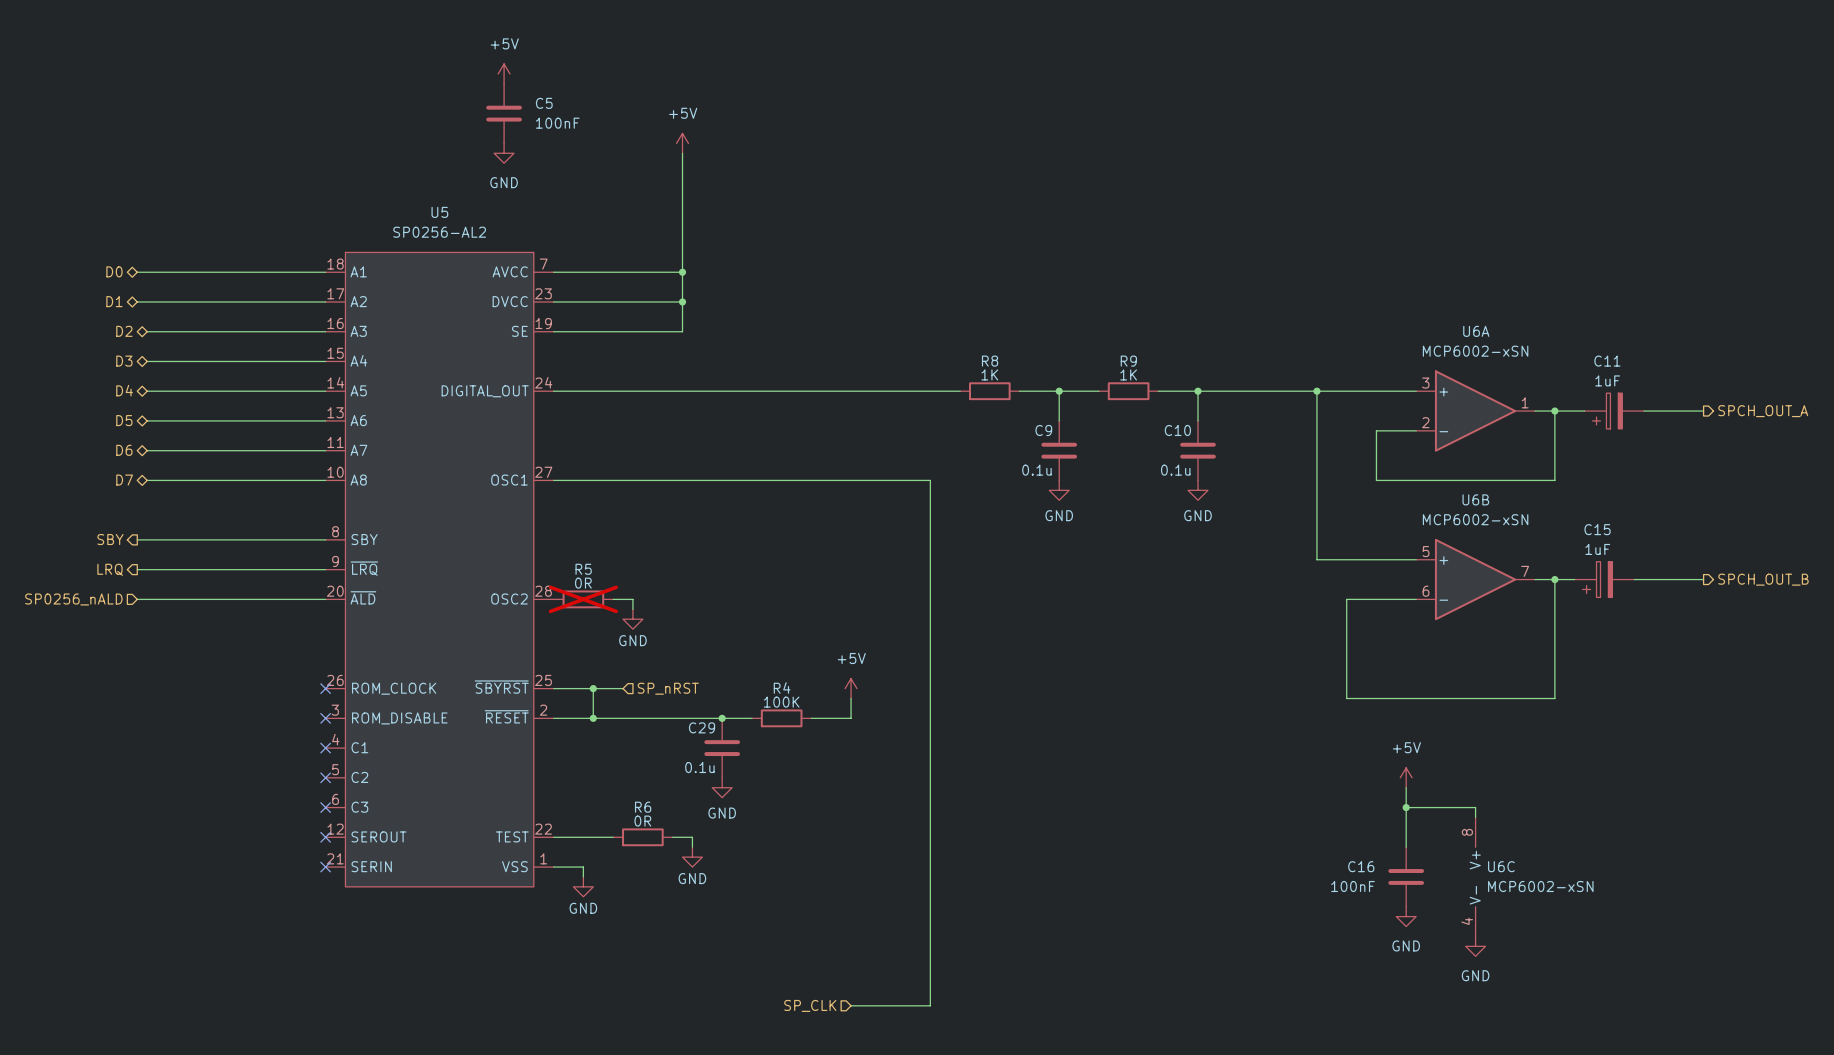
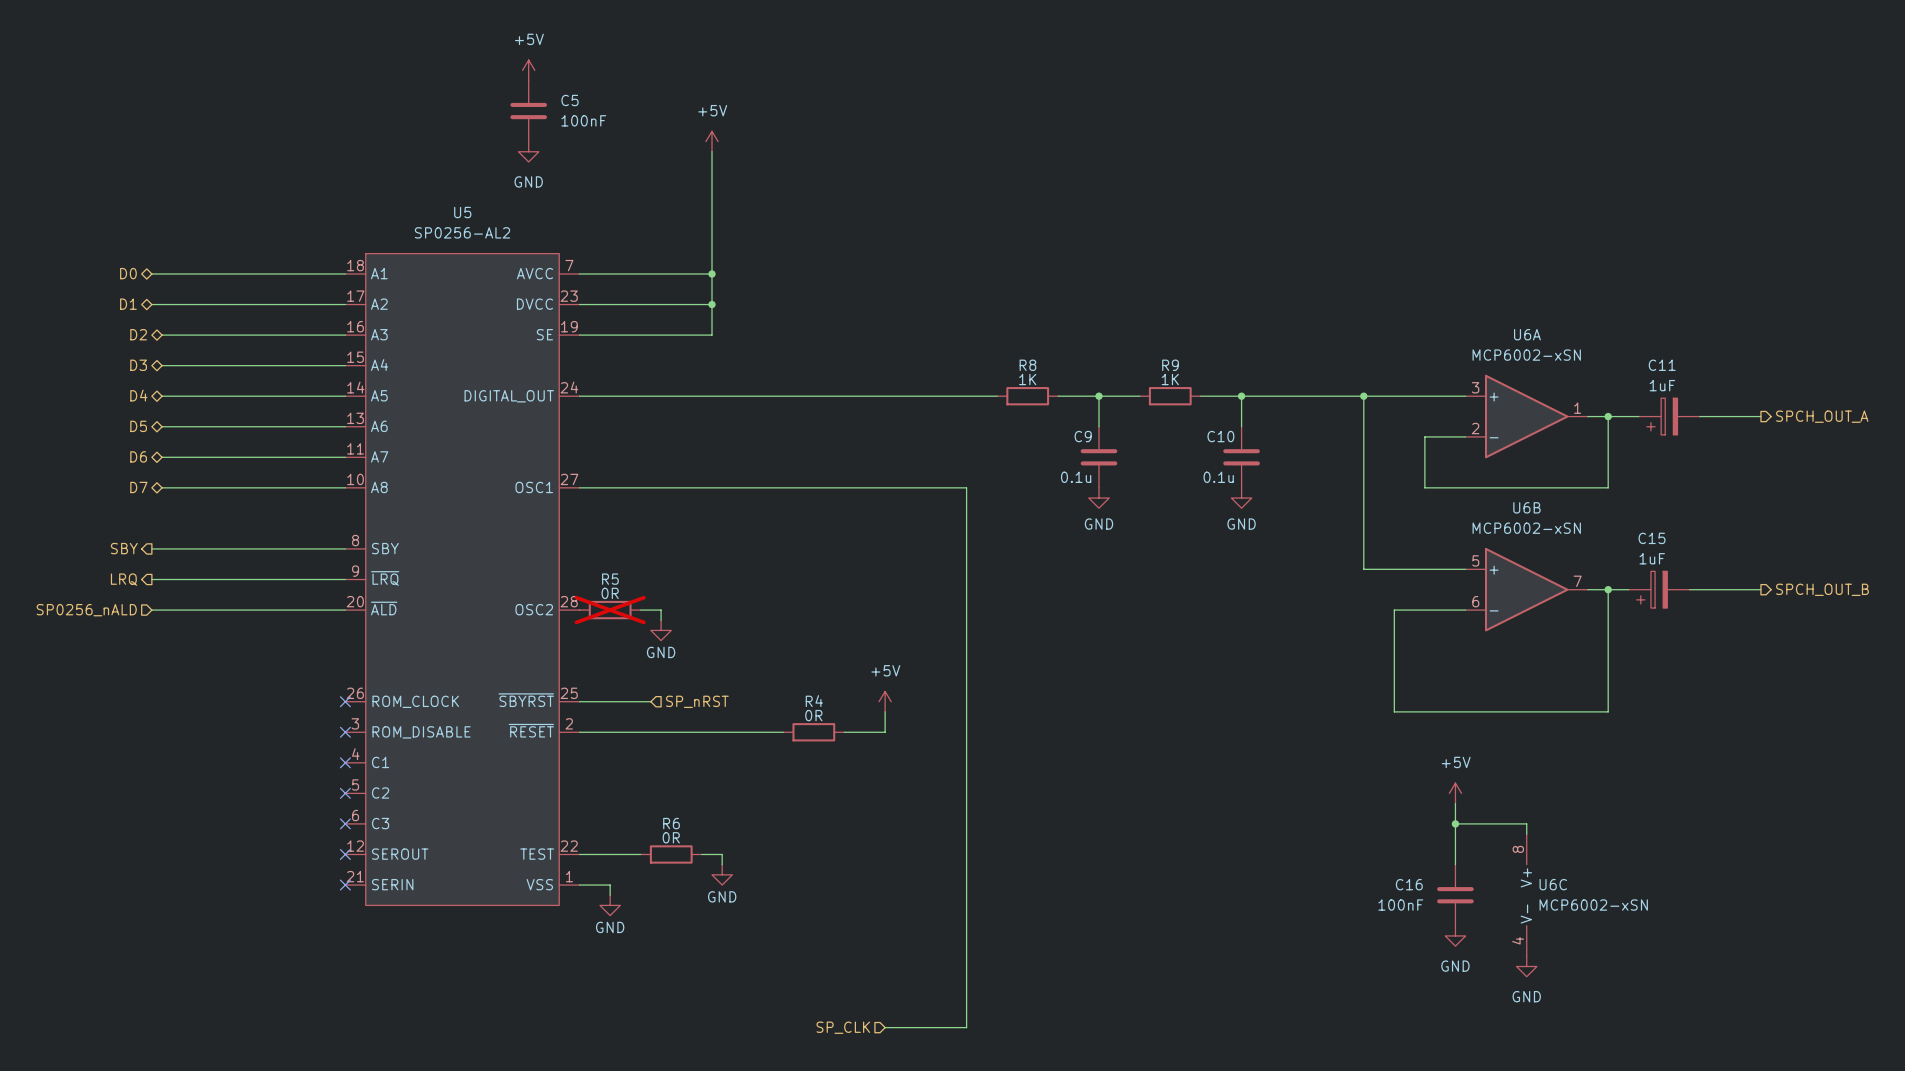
wire: (593, 688) (593, 718) -> none
junction: (593, 688) -> none
R4 value: 100K (781, 702) -> 0R (813, 715)
junction: (593, 718) -> none
junction: (722, 718) -> none
C29: 0.1u (722, 748) -> none
power symbol: GND (722, 787) -> none

